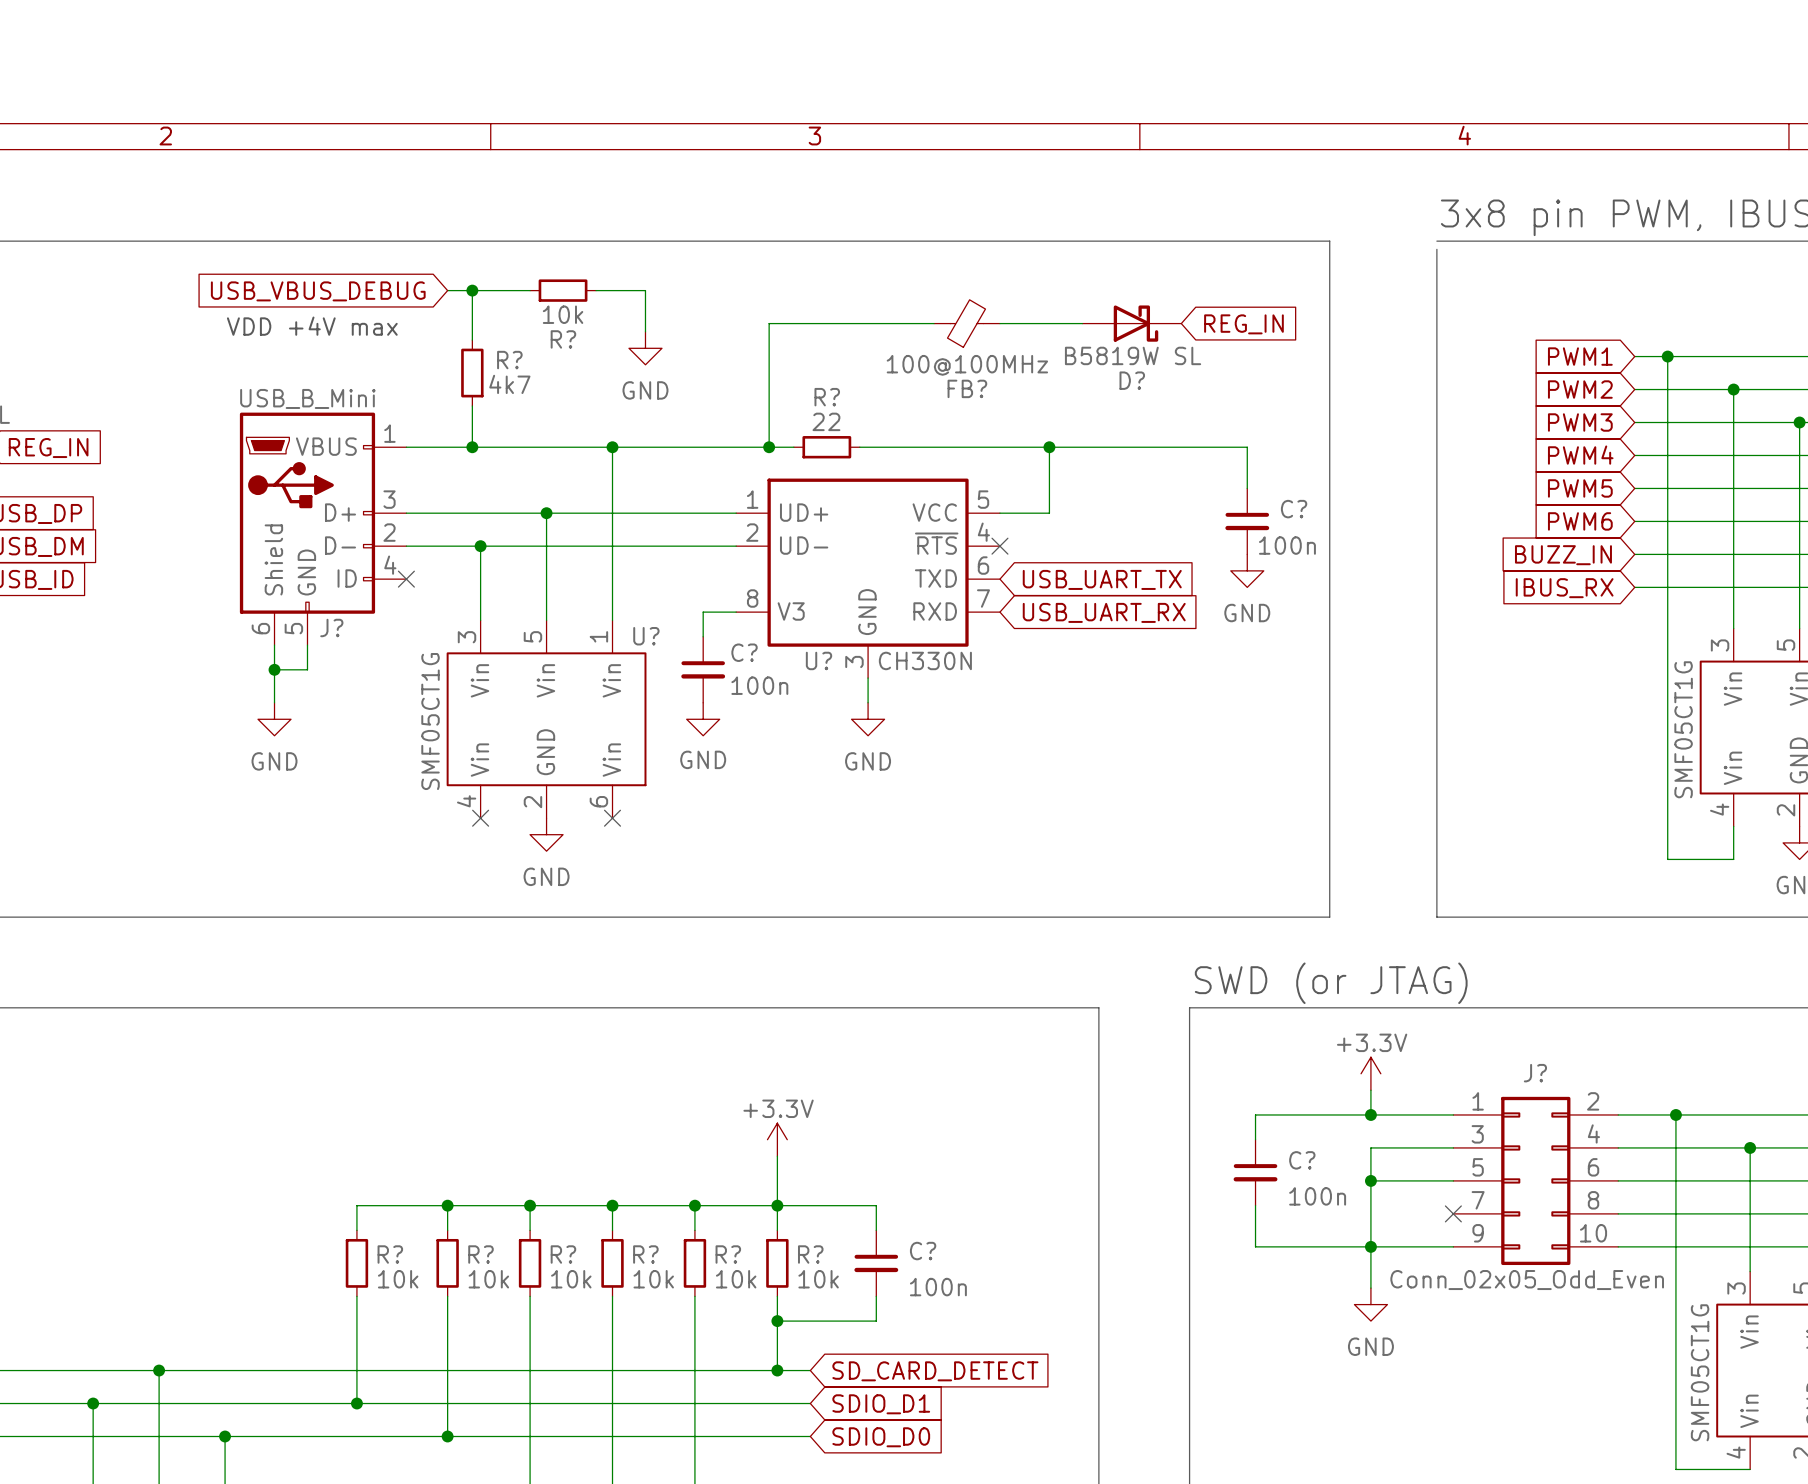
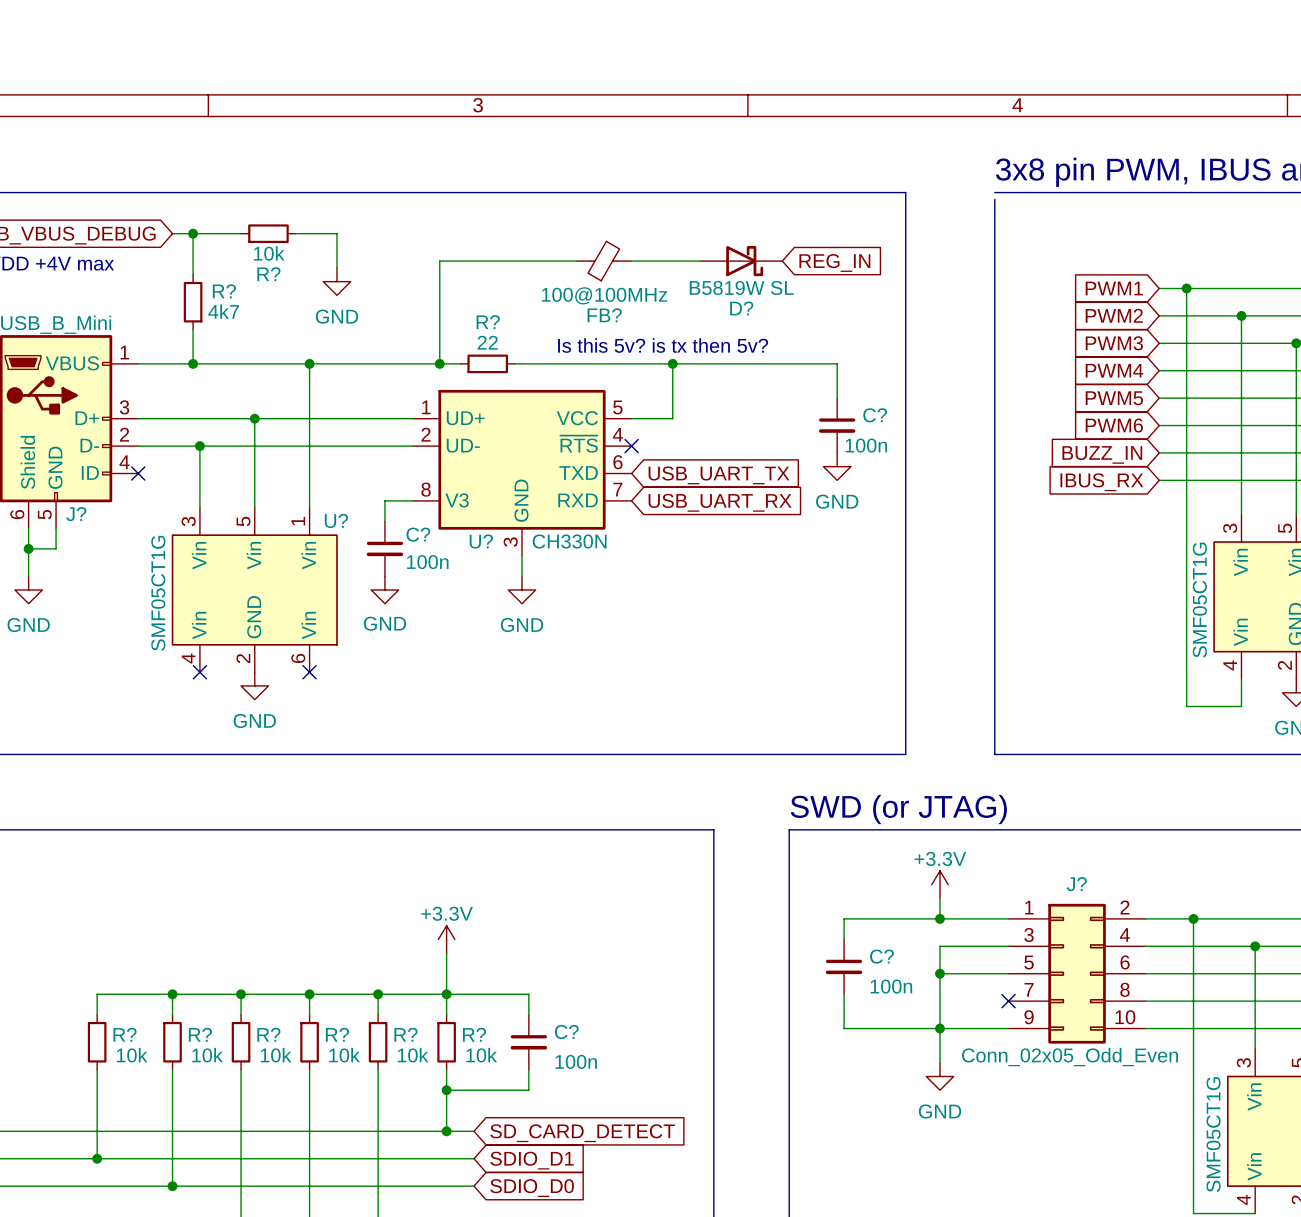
text: none -> Is this 5v? is tx then 5v? (663, 345)

